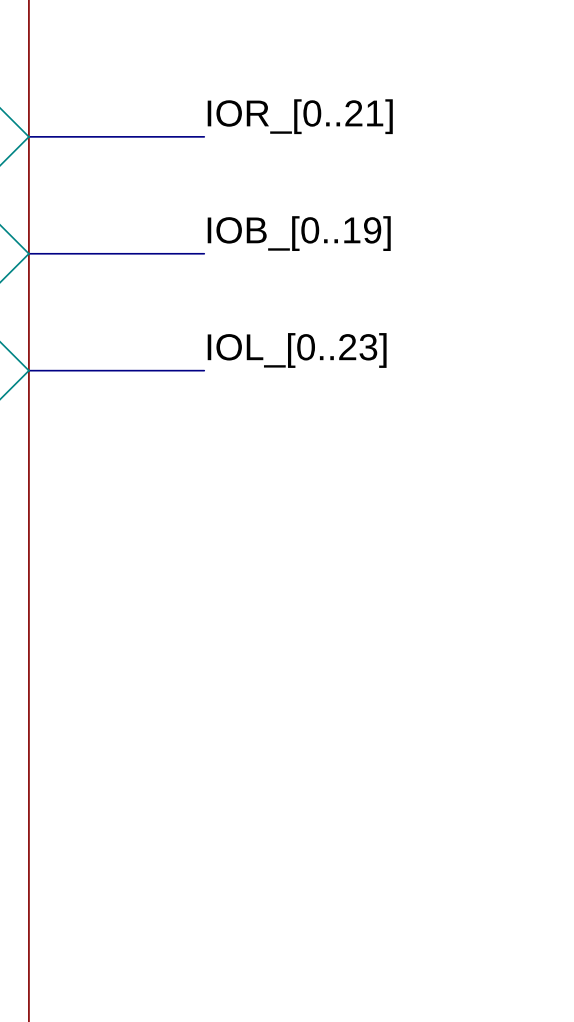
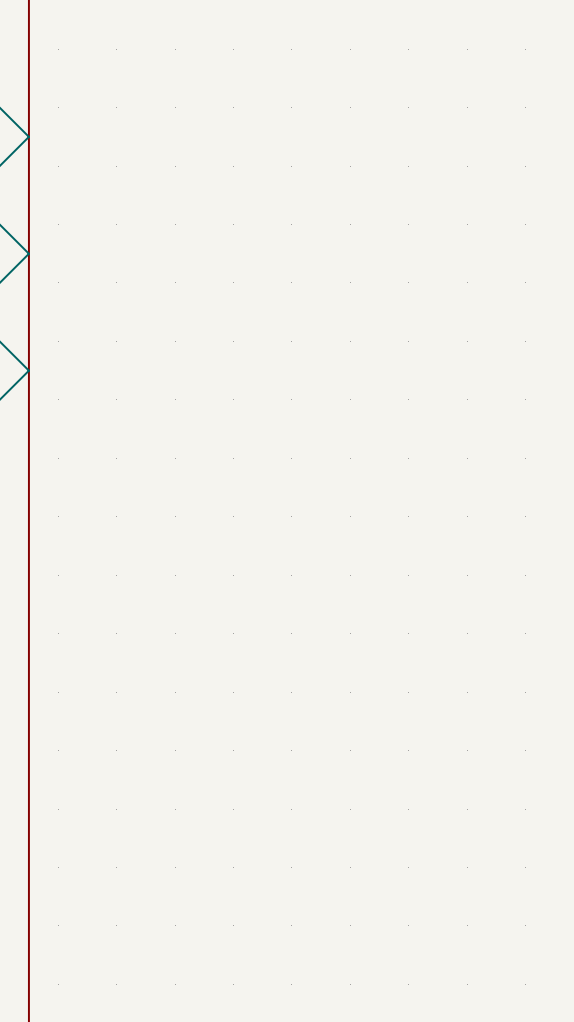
label: IOR_[0..21] (300, 116) -> none
bus: (28, 136) (204, 136) -> none
label: IOB_[0..19] (299, 233) -> none
bus: (28, 253) (204, 253) -> none
label: IOL_[0..23] (297, 350) -> none
bus: (28, 370) (204, 370) -> none

